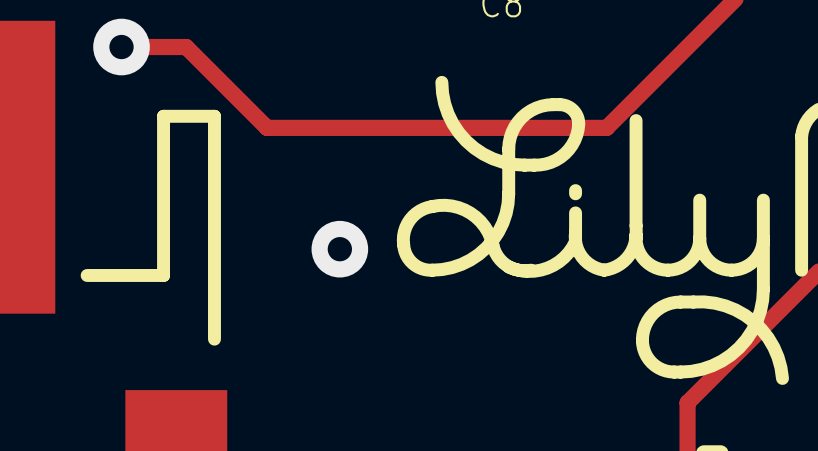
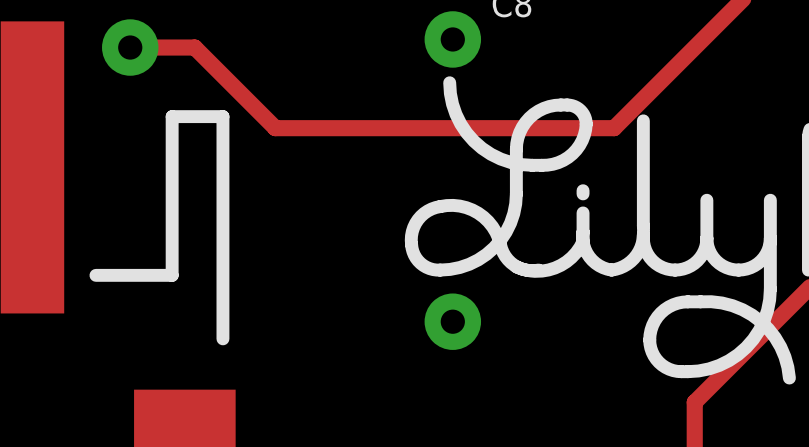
via: none -> (452, 39)
via: (339, 249) -> none
via: none -> (452, 321)

